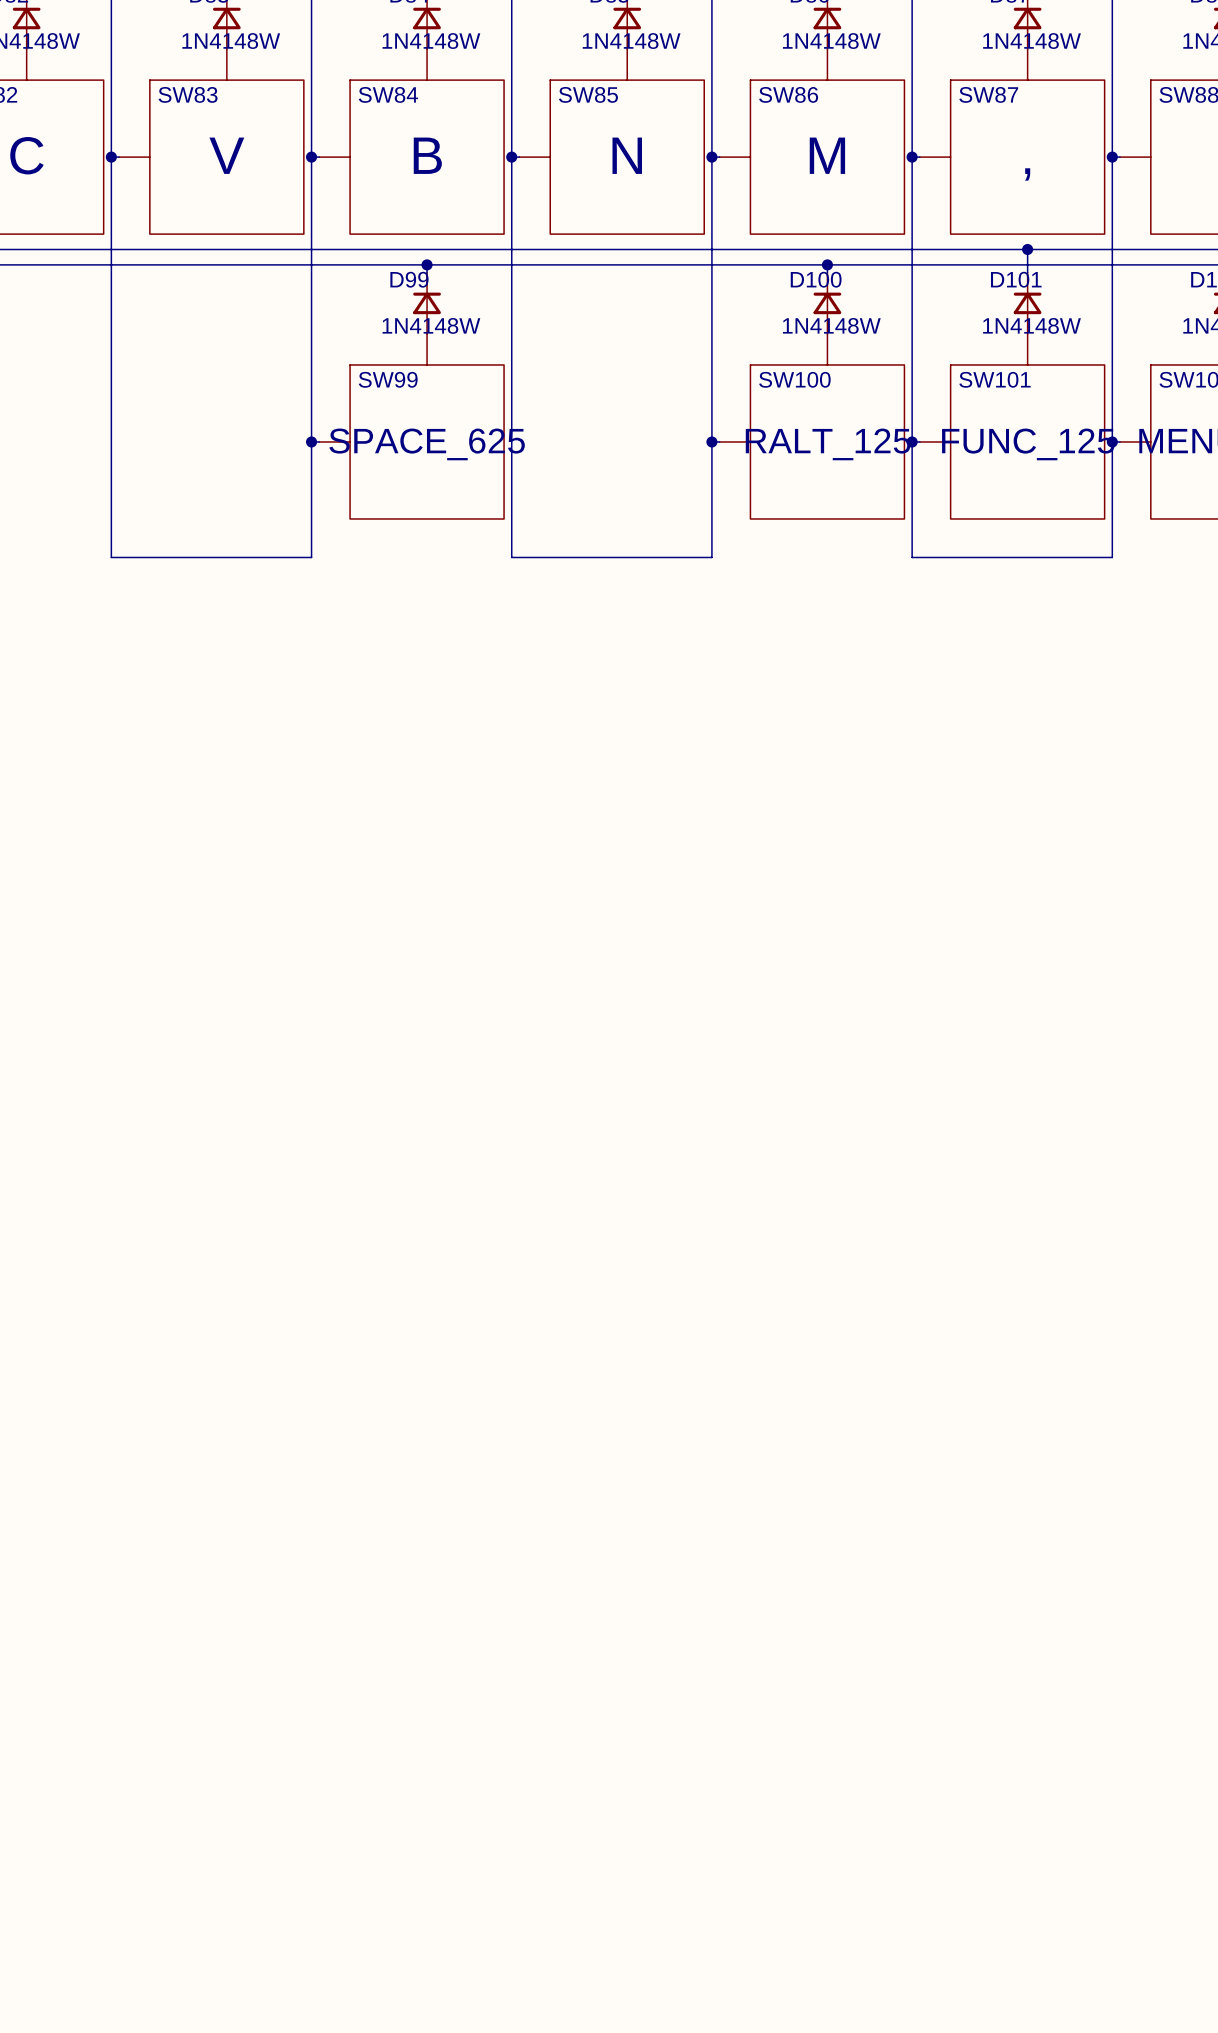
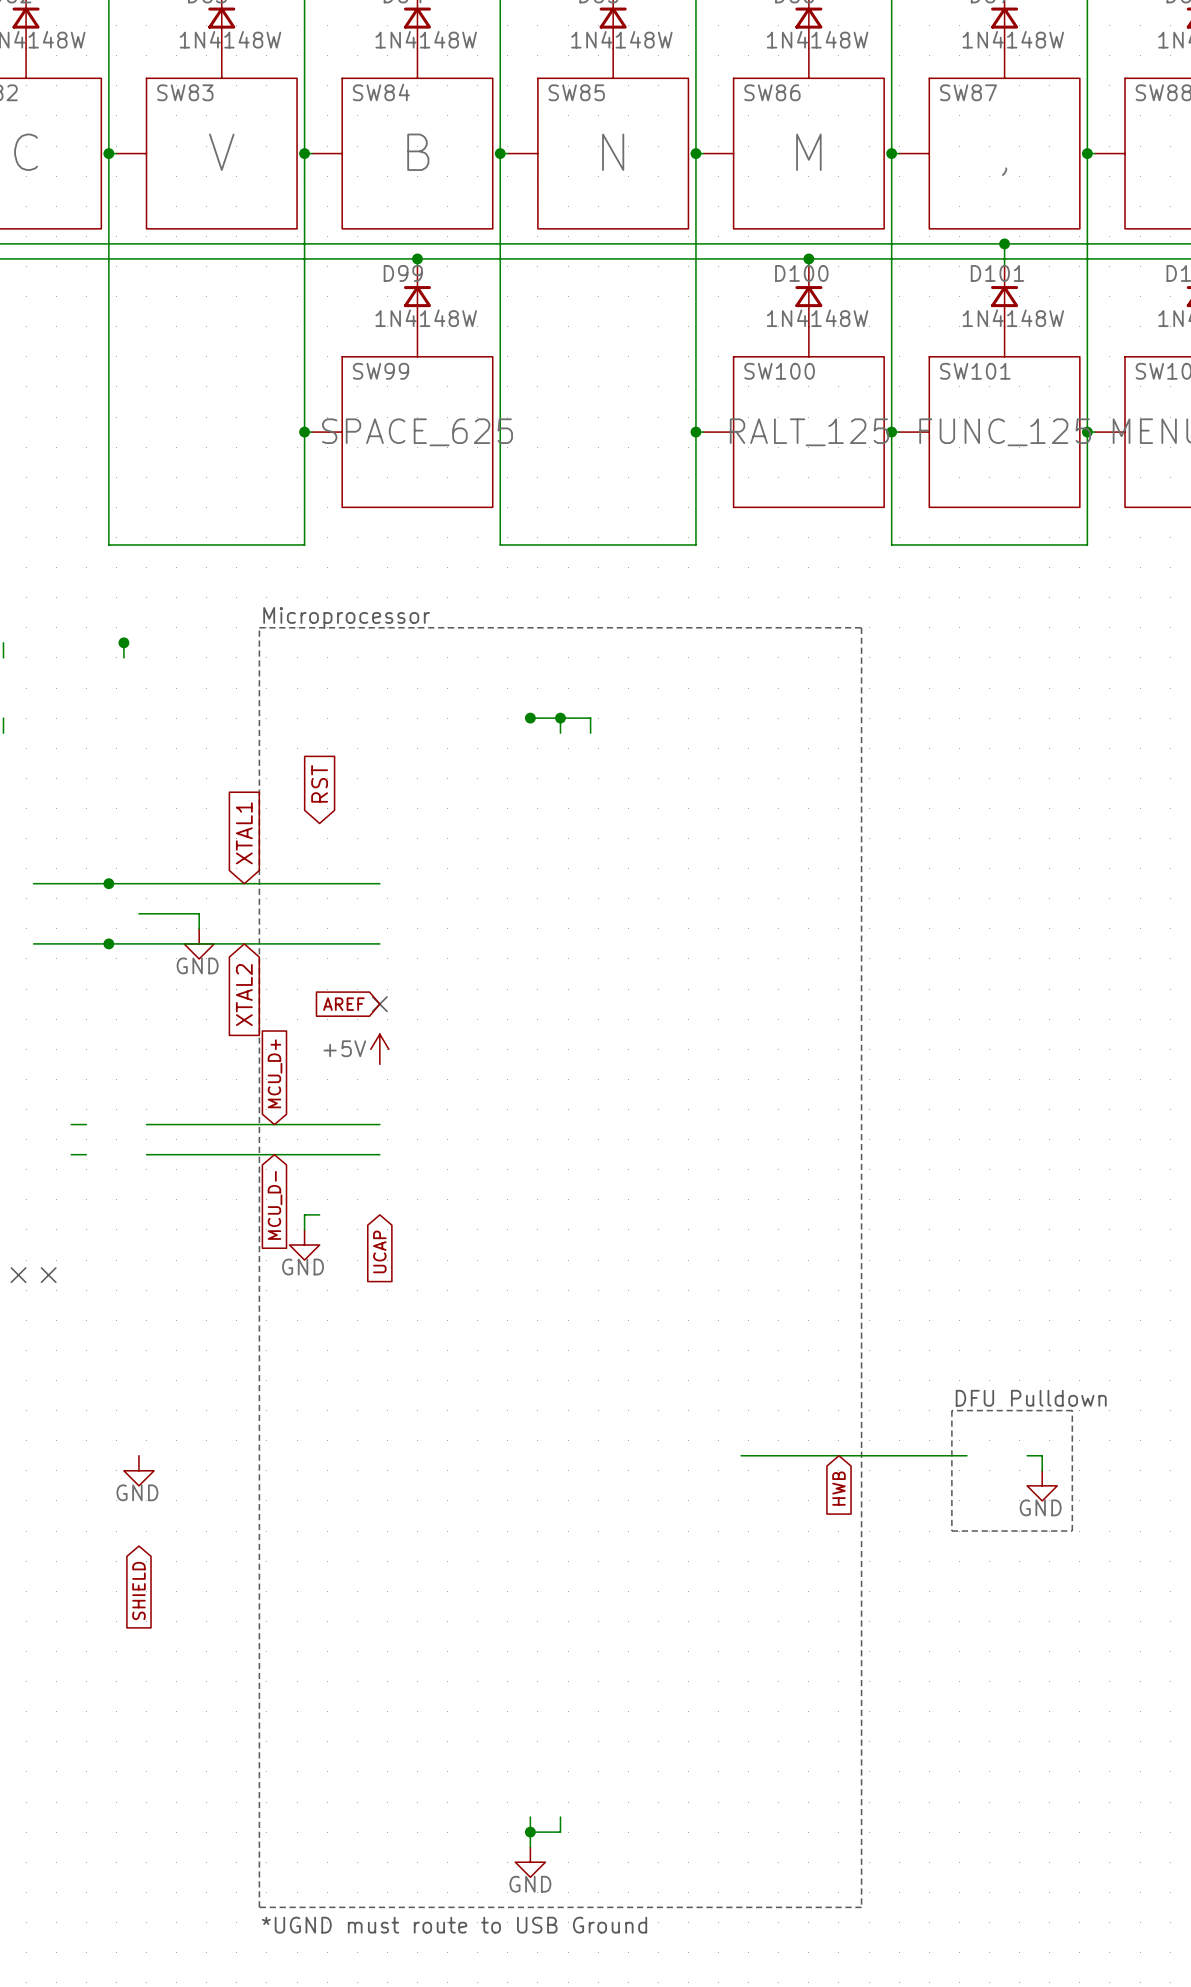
text: none -> Microprocessor (346, 617)
line: none -> (259, 627) (259, 1907) (861, 1907) (861, 627) (259, 627)
wire: none -> (3, 642) (3, 657)
wire: none -> (123, 642) (123, 657)
junction: none -> (123, 642)
wire: none -> (3, 718) (3, 733)
wire: none -> (530, 718) (590, 718) (590, 733)
junction: none -> (530, 718)
wire: none -> (560, 718) (560, 733)
junction: none -> (560, 718)
global label: none -> RST (319, 783)
global label: none -> XTAL1 (244, 833)
wire: none -> (33, 883) (379, 883)
junction: none -> (108, 883)
wire: none -> (138, 913) (199, 913) (199, 928)
wire: none -> (33, 943) (379, 943)
junction: none -> (108, 943)
power symbol: none -> GND (199, 943)
global label: none -> XTAL2 (244, 995)
global label: none -> AREF (343, 1004)
no-connect mark: none -> (379, 1004)
power symbol: none -> +5V (379, 1049)
global label: none -> MCU_D+ (275, 1073)
wire: none -> (71, 1124) (86, 1124)
wire: none -> (146, 1124) (379, 1124)
wire: none -> (71, 1154) (86, 1154)
wire: none -> (146, 1154) (379, 1154)
global label: none -> MCU_D- (275, 1205)
wire: none -> (319, 1214) (304, 1214) (304, 1229)
power symbol: none -> GND (304, 1245)
global label: none -> UCAP (379, 1251)
no-connect mark: none -> (18, 1275)
no-connect mark: none -> (48, 1275)
text: none -> DFU Pulldown (1031, 1398)
line: none -> (951, 1410) (1072, 1410) (1072, 1531) (951, 1531) (951, 1410)
wire: none -> (741, 1455) (966, 1455)
wire: none -> (1027, 1455) (1042, 1455) (1042, 1470)
power symbol: none -> GND (138, 1470)
power symbol: none -> GND (1042, 1485)
global label: none -> HWB (838, 1488)
global label: none -> SHIELD (138, 1590)
wire: none -> (530, 1817) (530, 1847)
wire: none -> (560, 1817) (560, 1832) (530, 1832)
junction: none -> (530, 1832)
power symbol: none -> GND (530, 1862)
text: none -> *UGND must route to USB Ground (454, 1925)

